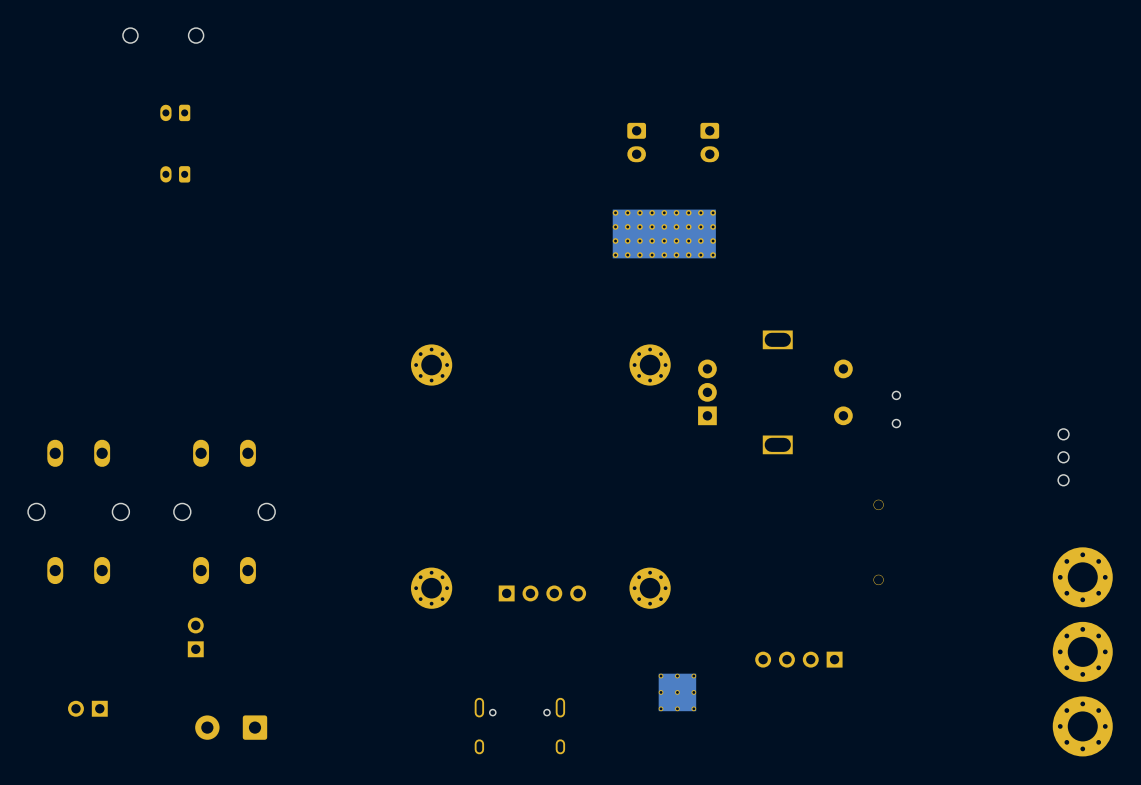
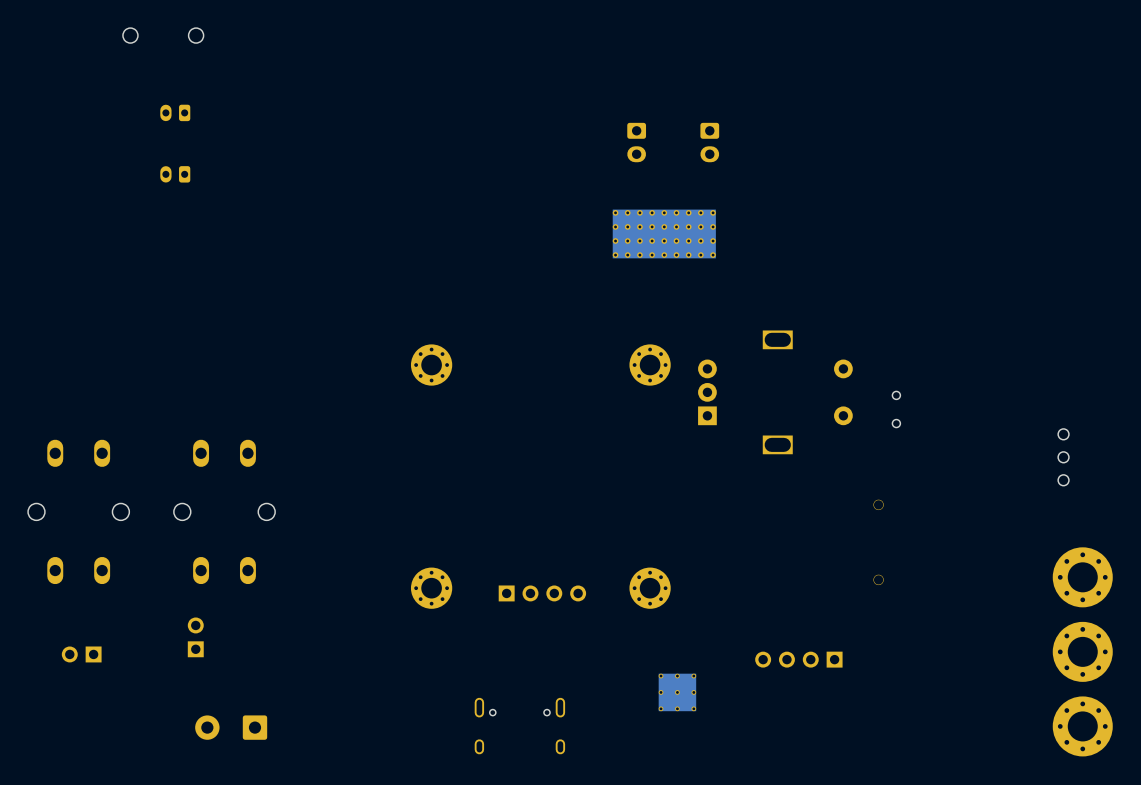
part position: (87, 708) -> (81, 654)

